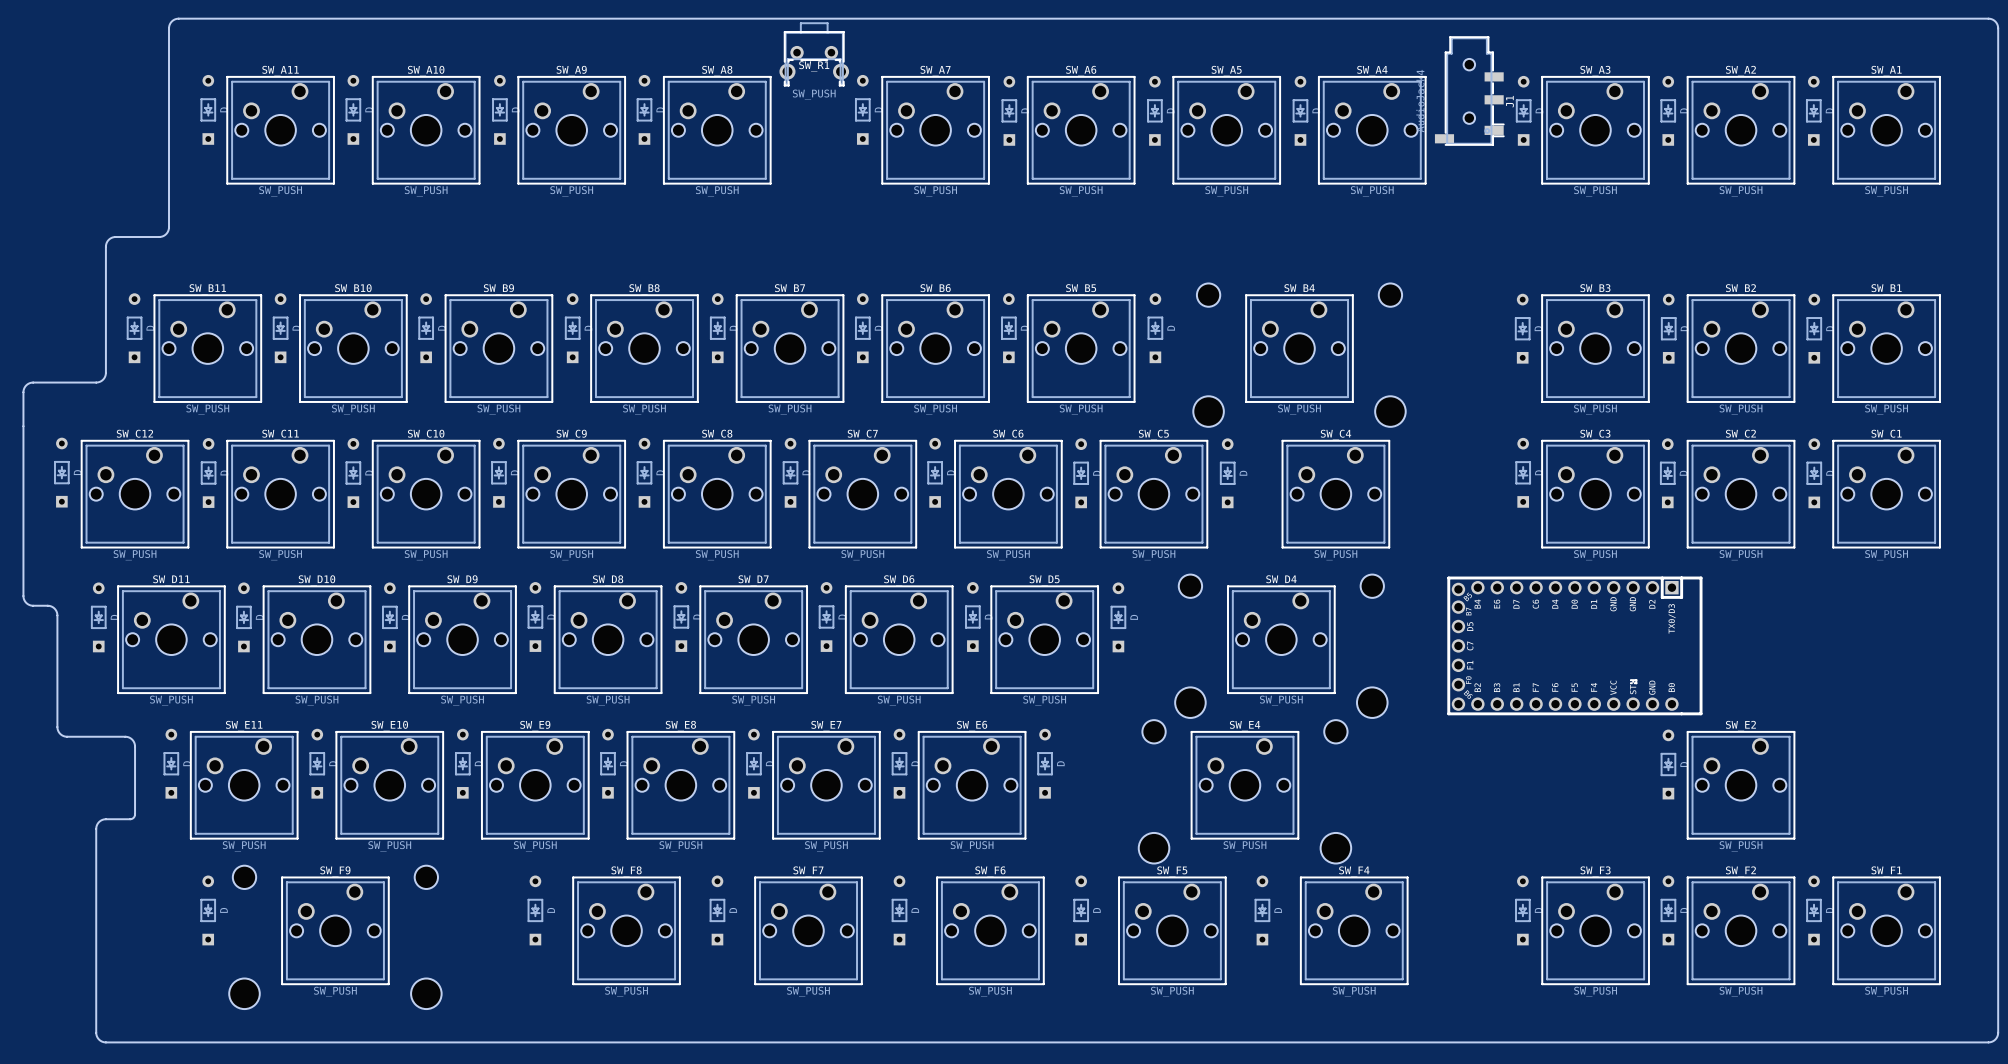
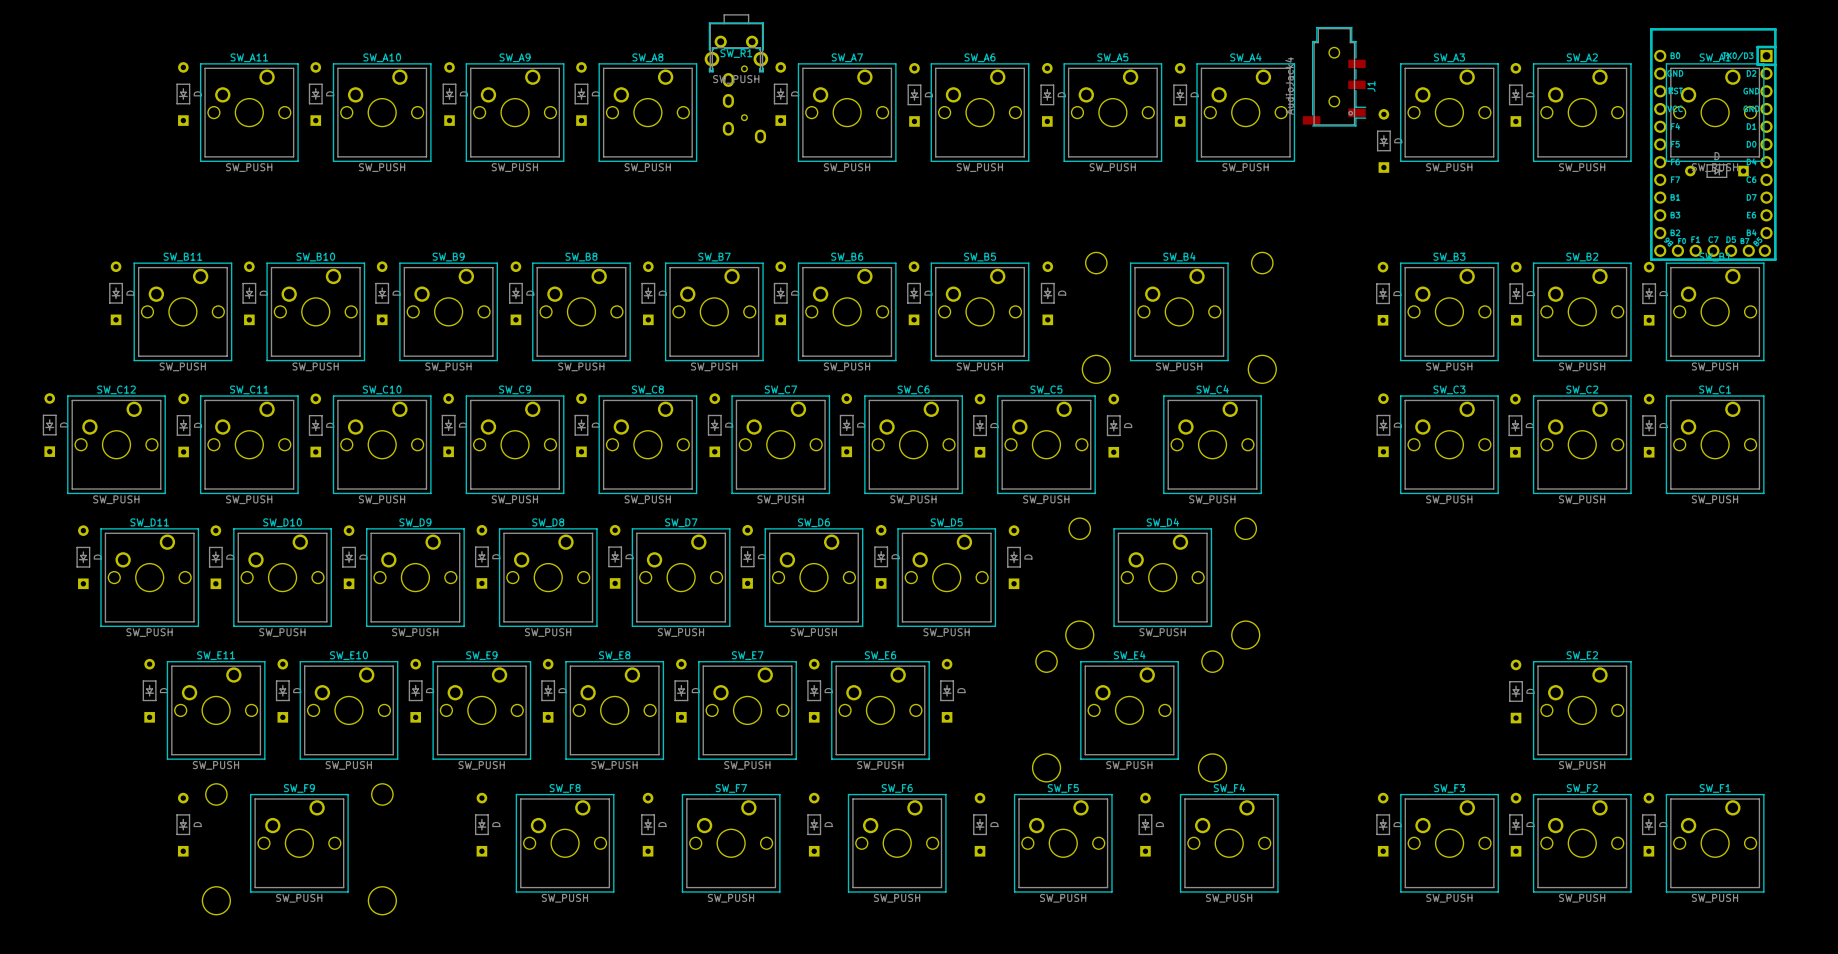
part position: (1523, 110) -> (1383, 140)
part rotation: 0° (1813, 110) -> 90° counterclockwise (1716, 171)
part position: (1813, 110) -> (1716, 171)
part: none -> (744, 104)
part: none -> (1713, 144)
board edge: (105, 372) (106, 242) (114, 237) (161, 236) (168, 229) (169, 28) (171, 22) (177, 18) (1988, 18) (1994, 20) (1998, 27) (1998, 1032) (1996, 1038) (1992, 1041) (104, 1042) (99, 1039) (96, 1032) (96, 828) -> none
board edge: (105, 372) (103, 378) (97, 382) (31, 382) (24, 388) (23, 596) (28, 604) (50, 606) (57, 612) (57, 727) (59, 732) (67, 736) (125, 736) -> none
part: (1574, 645) -> none
board edge: (125, 736) (132, 739) (134, 745) (134, 815) (130, 819) (102, 819) (98, 823) (96, 828) -> none

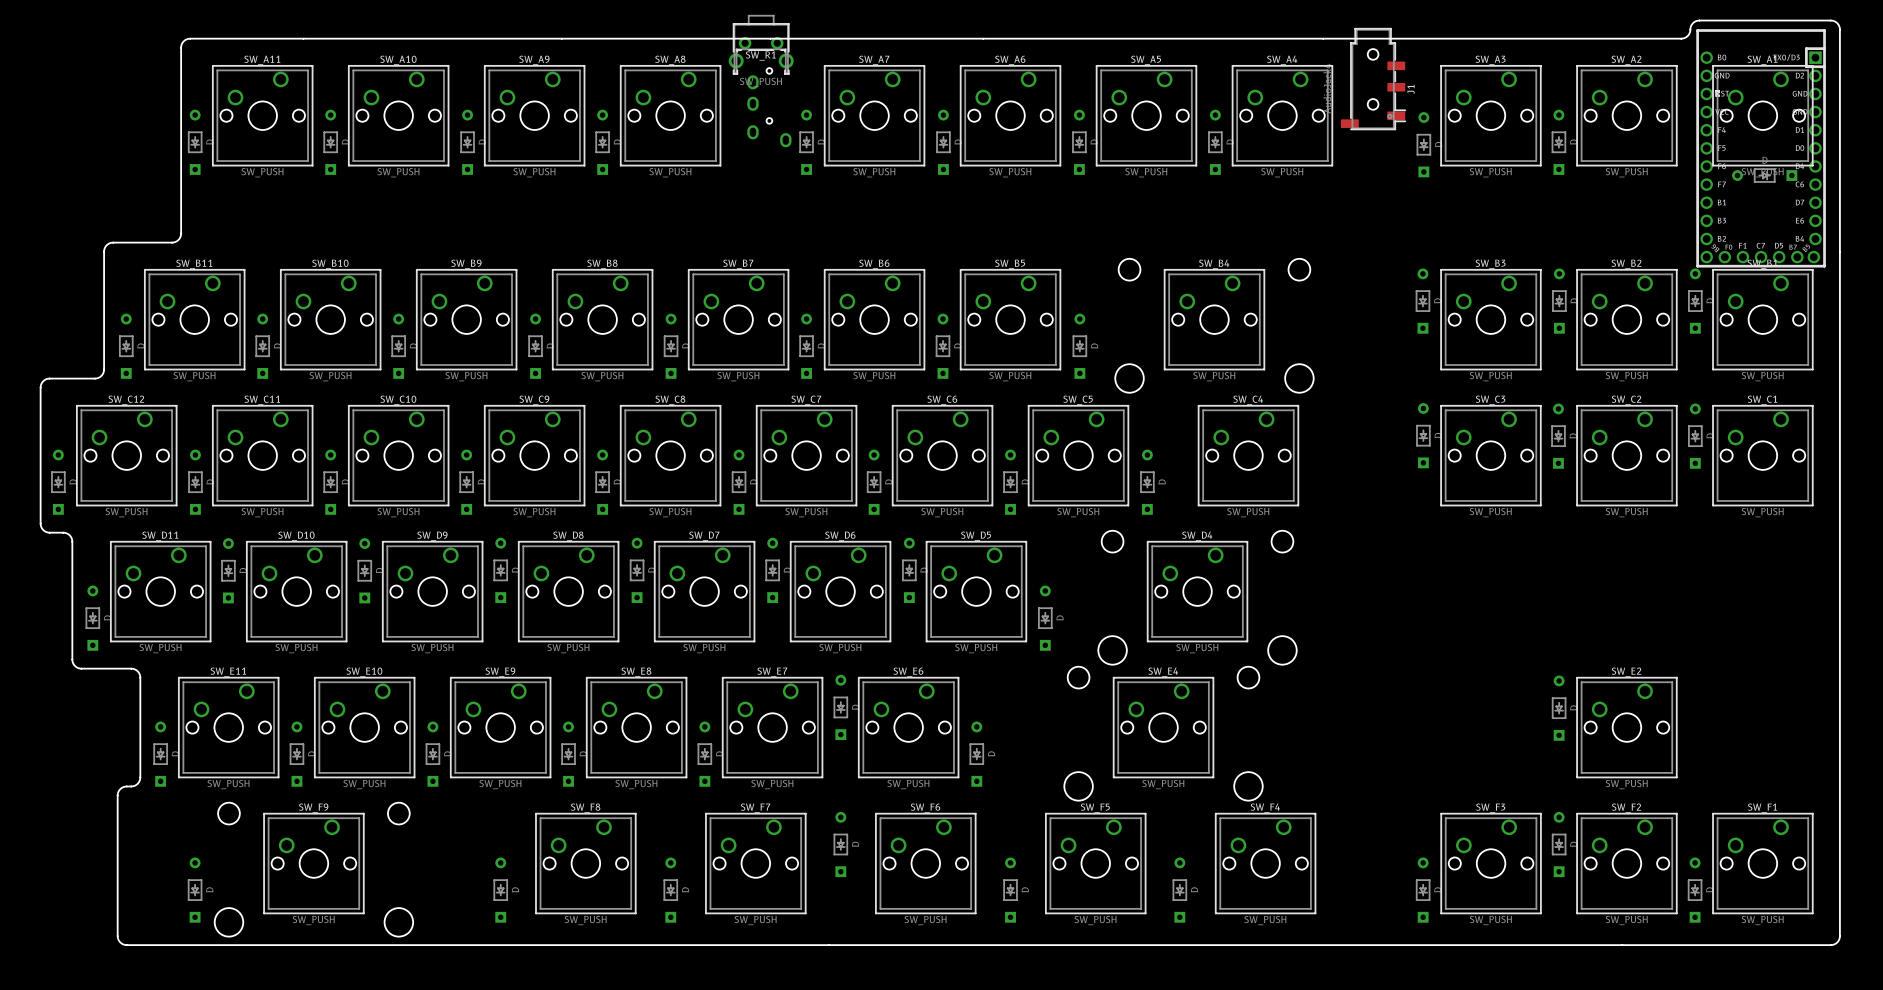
part position: (183, 94) -> (195, 142)
part position: (315, 94) -> (330, 142)
part position: (449, 94) -> (467, 142)
part position: (581, 94) -> (602, 142)
part position: (780, 94) -> (806, 142)
part position: (914, 94) -> (943, 142)
part position: (1047, 94) -> (1079, 142)
part position: (1180, 94) -> (1215, 142)
part position: (1515, 94) -> (1558, 142)
board edge: none -> (181, 233) (181, 47) (182, 42) (189, 38) (1681, 38) (1687, 36) (1692, 24) (1698, 20) (1834, 21) (1838, 24) (1839, 29) (1839, 939) (1835, 943) (1830, 945) (123, 944) (119, 941) (117, 936) (117, 795) (121, 788) (135, 785) (140, 778) (140, 676) (137, 671) (133, 668) (80, 668) (73, 663) (72, 539) (65, 532) (46, 531) (40, 524) (40, 386) (43, 381) (47, 378) (96, 378) (103, 372) (104, 251) (106, 245) (113, 242) (173, 242) (178, 239) (181, 233)
part position: (116, 293) -> (126, 346)
part position: (249, 293) -> (262, 346)
part position: (382, 293) -> (398, 346)
part position: (515, 293) -> (535, 346)
part position: (648, 293) -> (671, 346)
part position: (780, 293) -> (806, 346)
part position: (914, 293) -> (942, 346)
part position: (1047, 293) -> (1079, 346)
part position: (49, 425) -> (58, 482)
part position: (183, 425) -> (195, 482)
part position: (315, 425) -> (330, 482)
part position: (448, 425) -> (466, 482)
part position: (581, 425) -> (602, 482)
part position: (714, 425) -> (739, 482)
part position: (846, 425) -> (874, 482)
part position: (980, 425) -> (1010, 482)
part position: (1113, 425) -> (1147, 482)
part position: (83, 557) -> (92, 618)
part position: (1014, 557) -> (1045, 618)
part position: (149, 690) -> (160, 754)
part position: (282, 690) -> (296, 754)
part position: (415, 690) -> (432, 754)
part position: (548, 690) -> (568, 754)
part position: (681, 690) -> (704, 754)
part position: (947, 690) -> (976, 754)
part position: (183, 824) -> (195, 890)
part position: (481, 824) -> (500, 890)
part position: (648, 824) -> (670, 890)
part position: (980, 824) -> (1010, 890)
part position: (1145, 824) -> (1179, 890)
part position: (1383, 824) -> (1423, 890)
part position: (1648, 824) -> (1695, 890)

